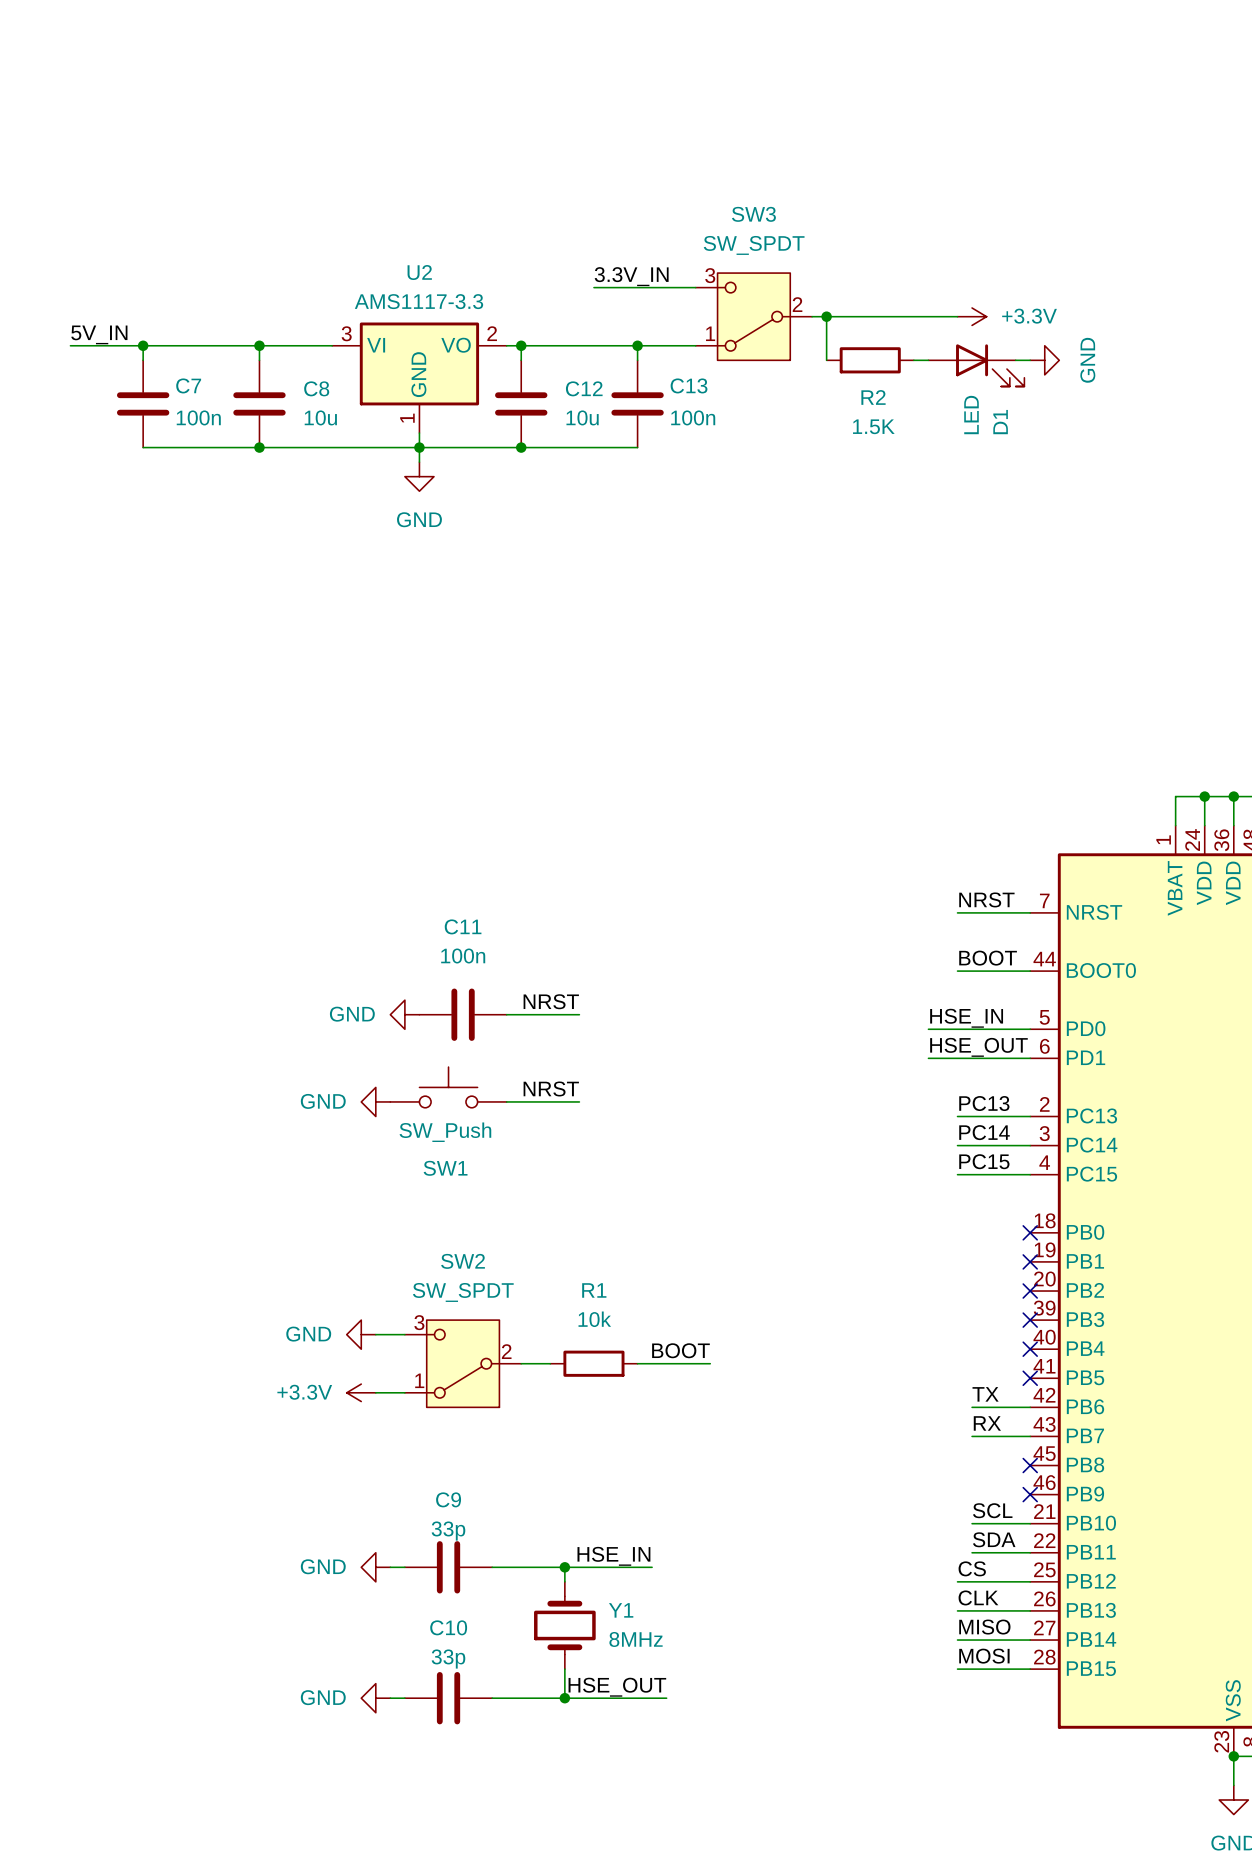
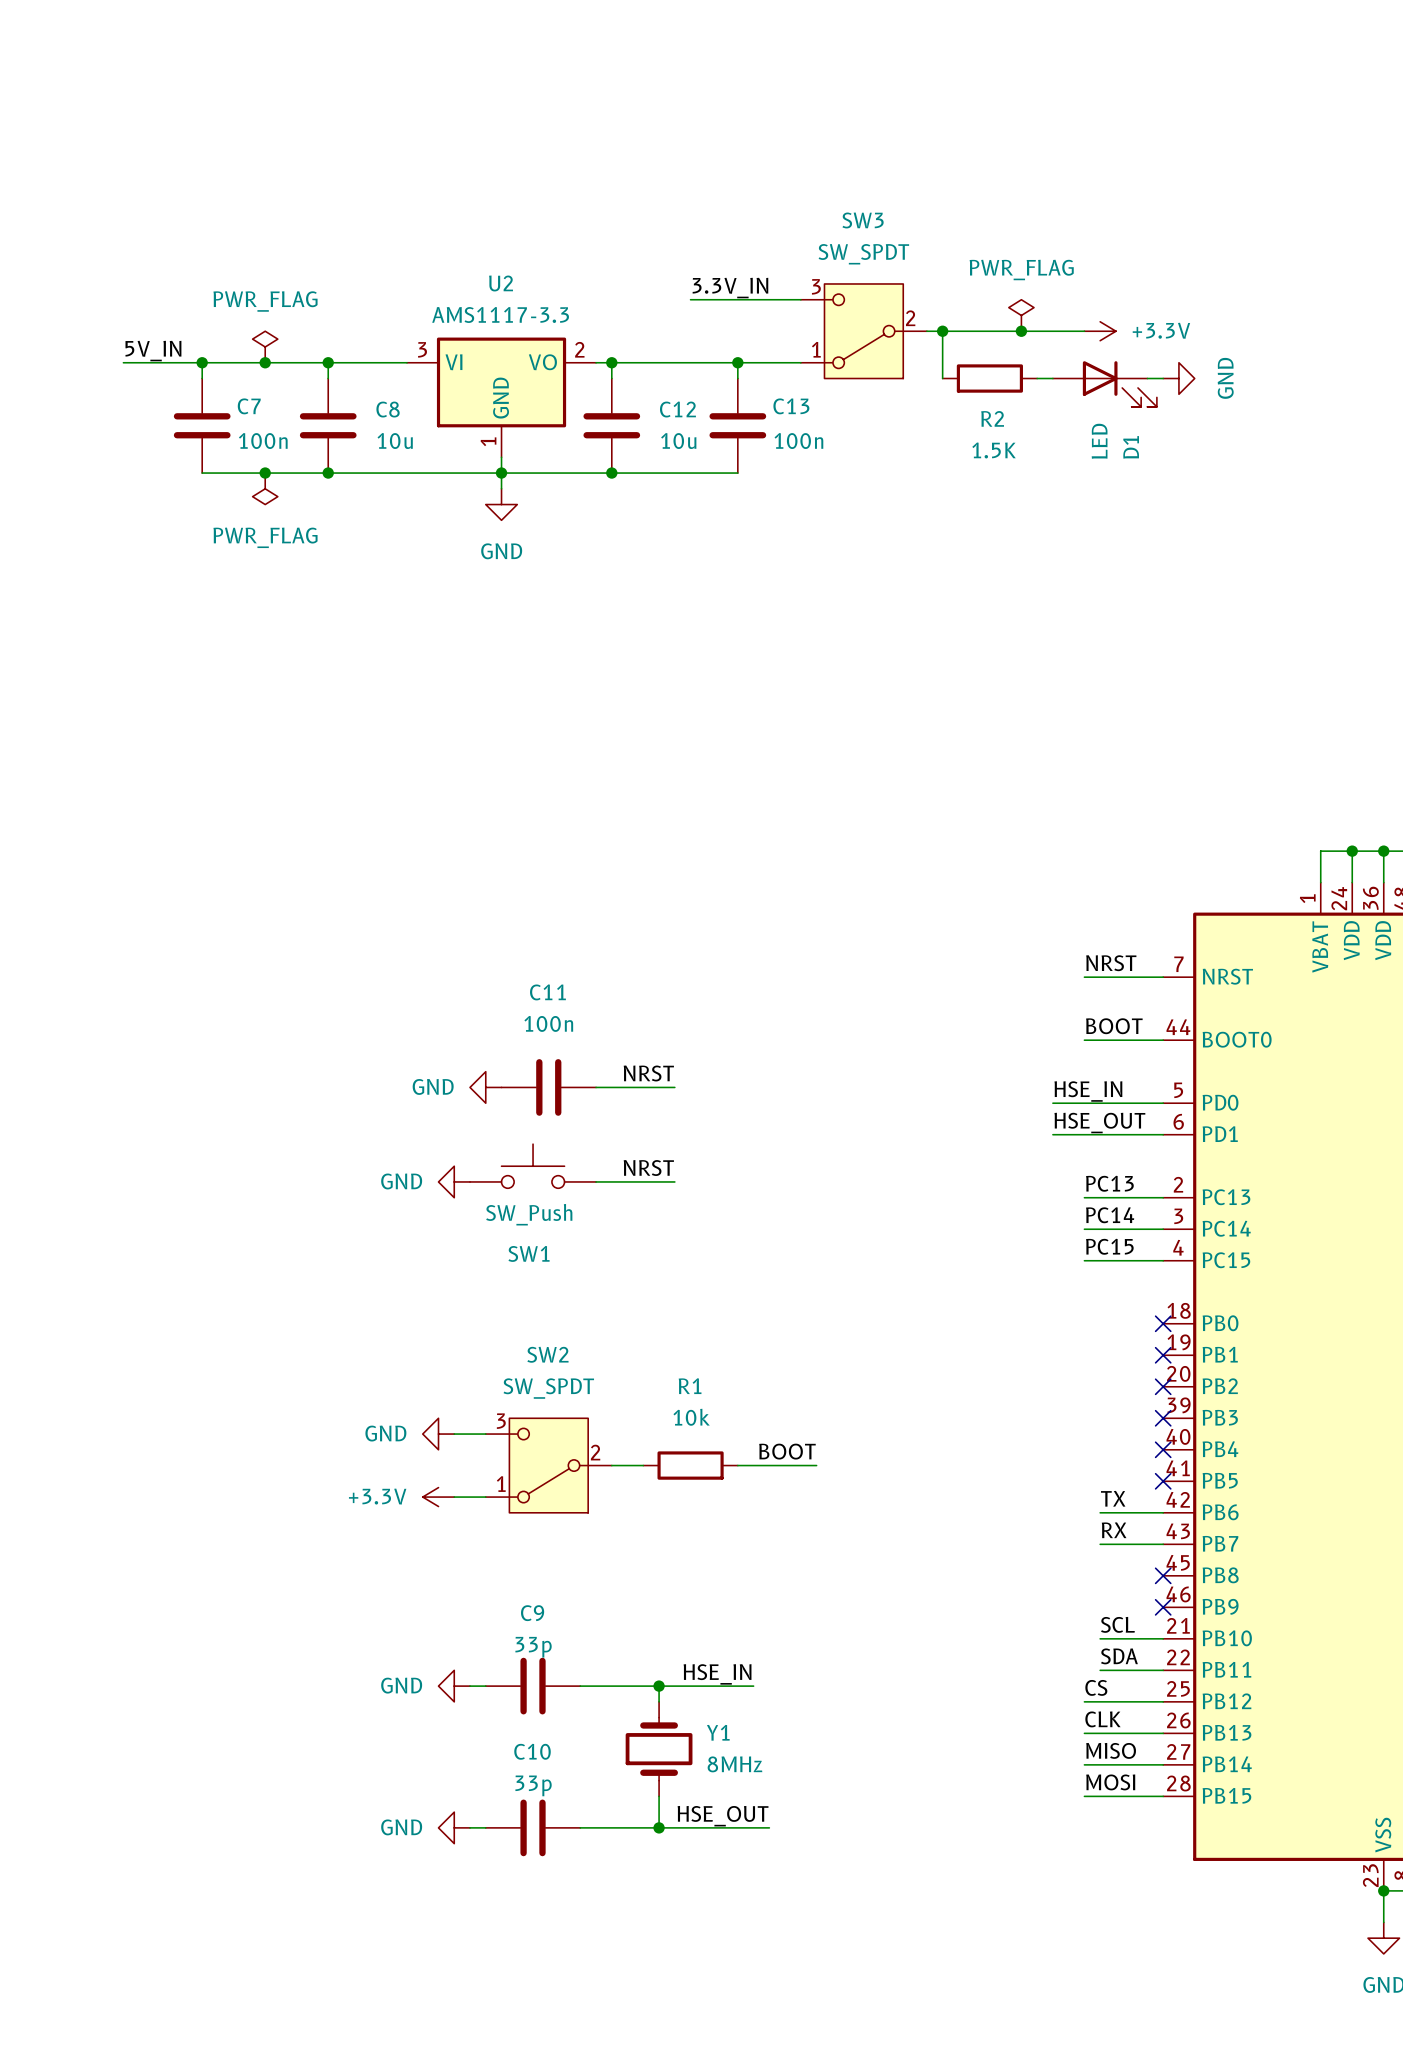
power symbol: none -> PWR_FLAG (1021, 315)
junction: none -> (1021, 331)
power symbol: none -> PWR_FLAG (265, 347)
junction: none -> (265, 362)
junction: none -> (265, 473)
power symbol: none -> PWR_FLAG (265, 488)

